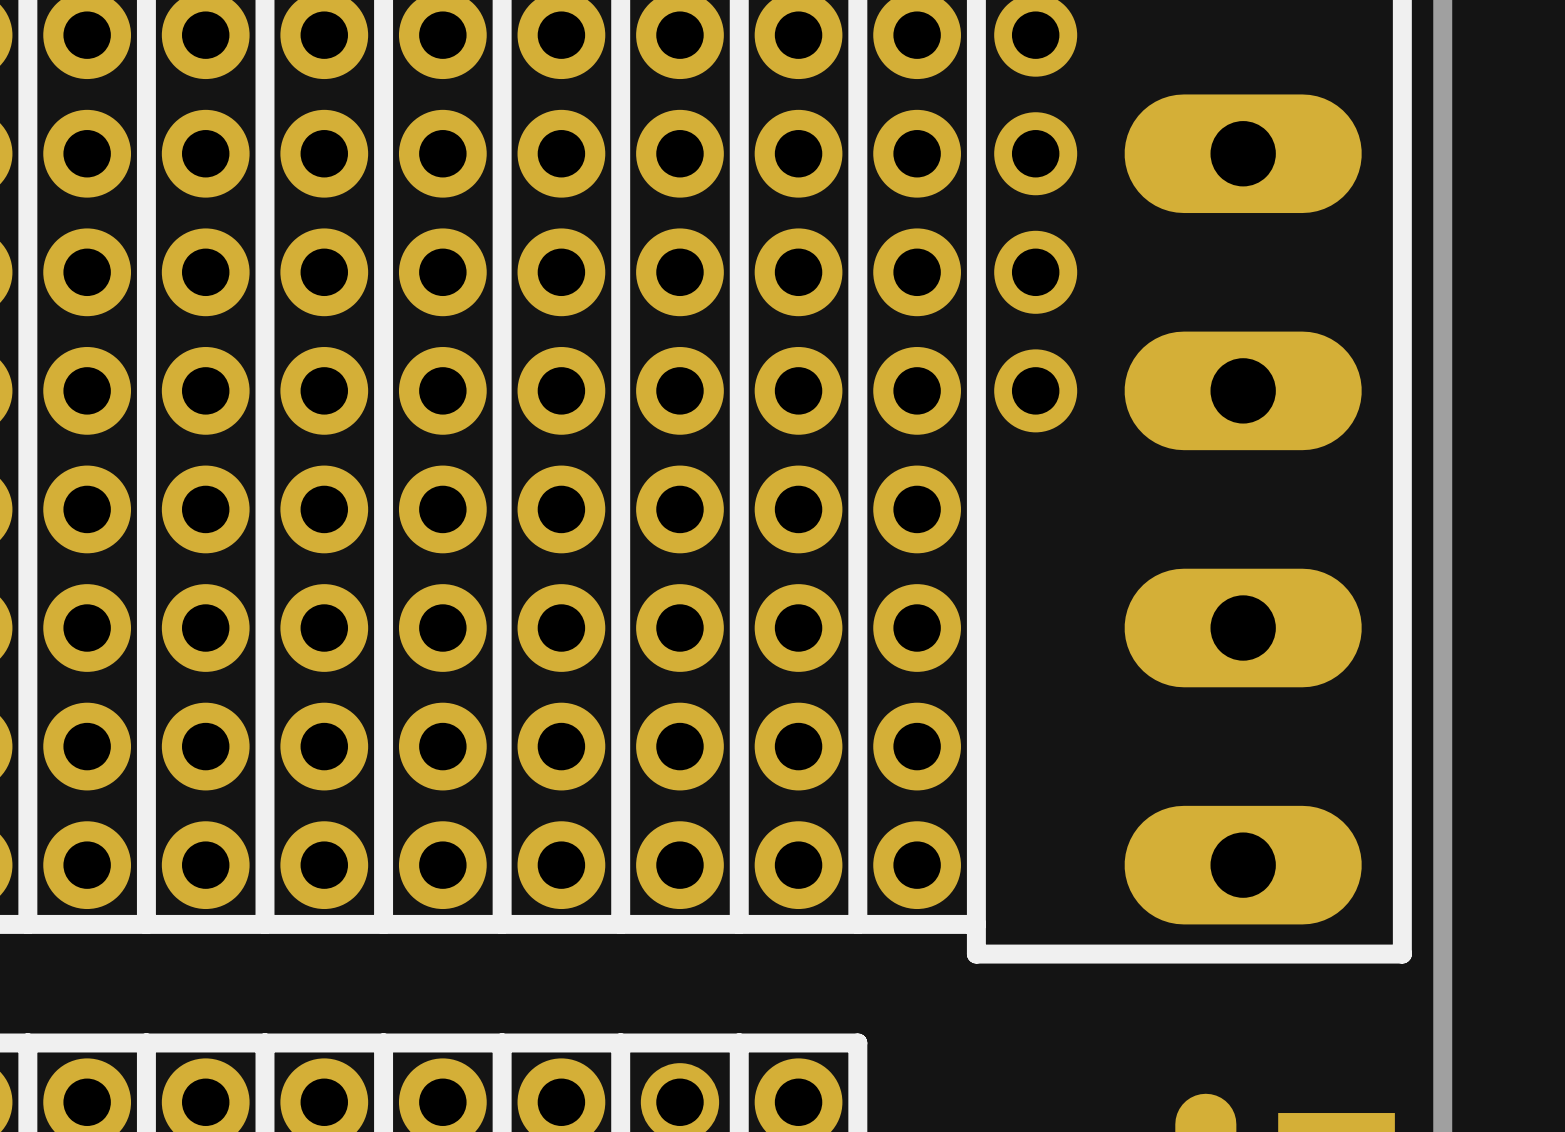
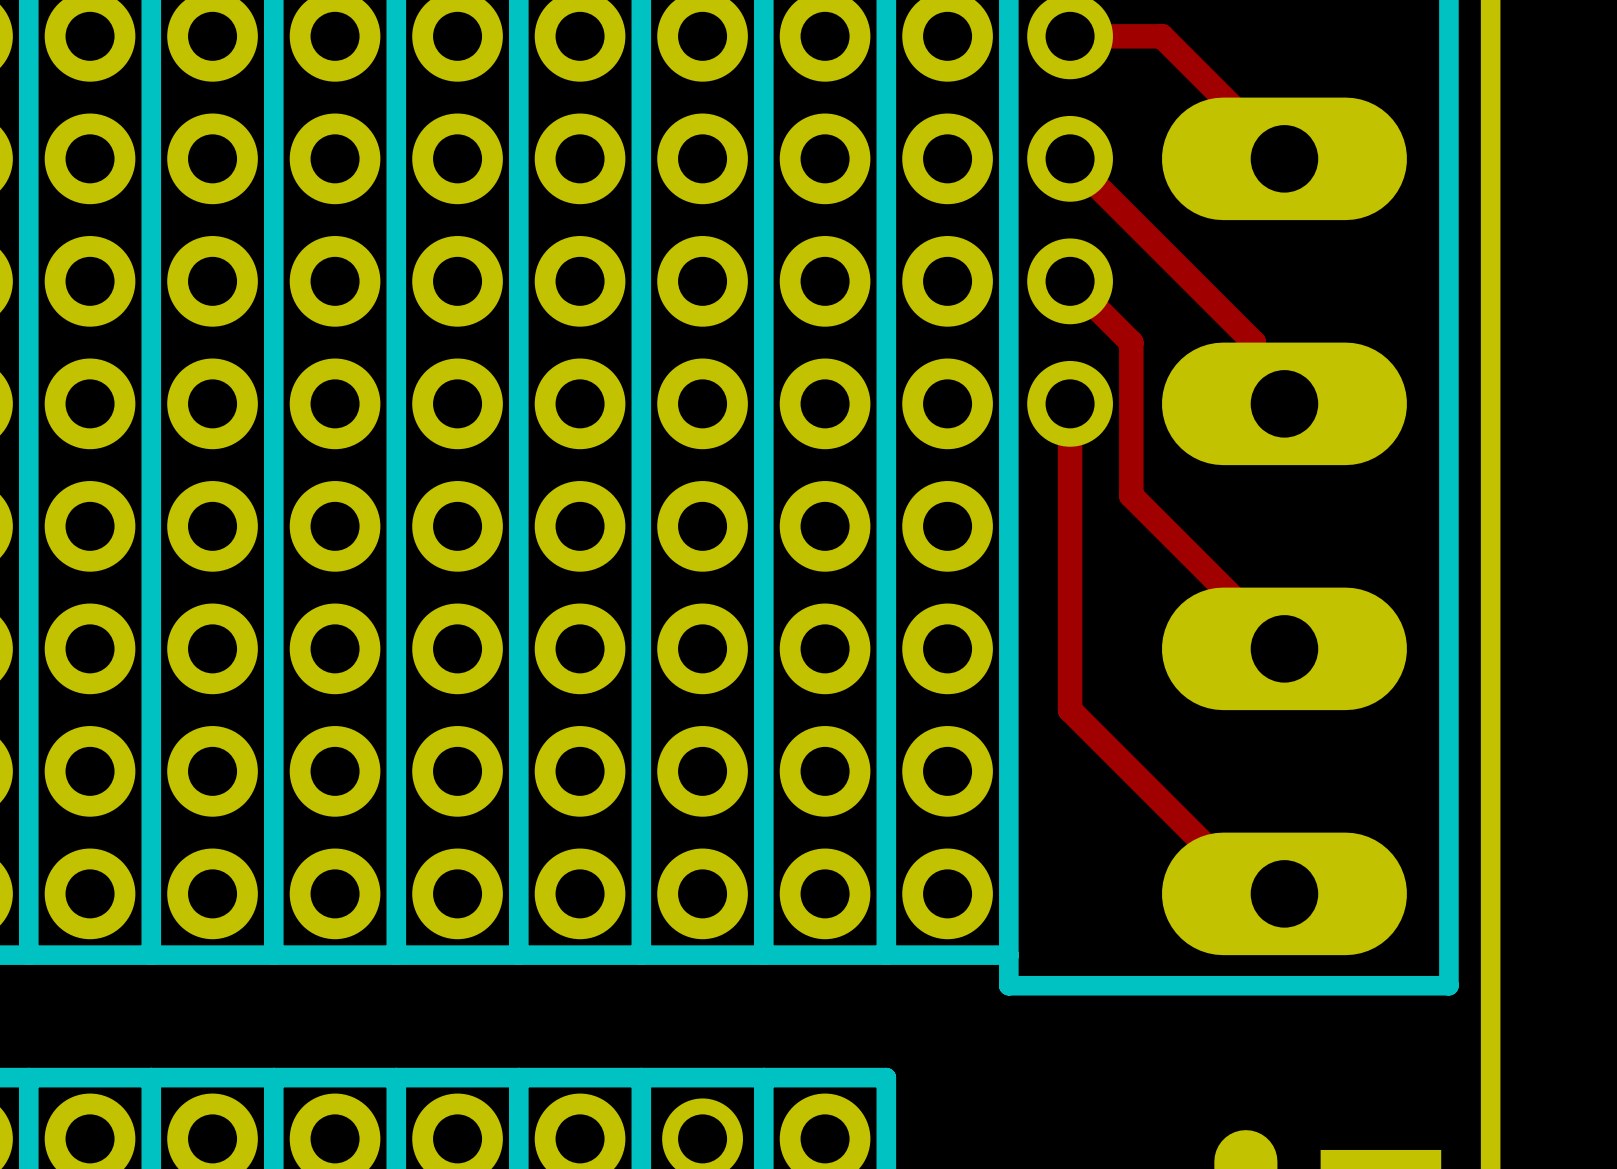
track: none -> (1070, 36) (1161, 36) (1284, 158)
track: none -> (1070, 158) (1253, 342) (1253, 373) (1284, 403)
track: none -> (1070, 281) (1131, 342) (1131, 495) (1284, 648)
track: none -> (1070, 403) (1070, 710) (1253, 893) (1284, 893)

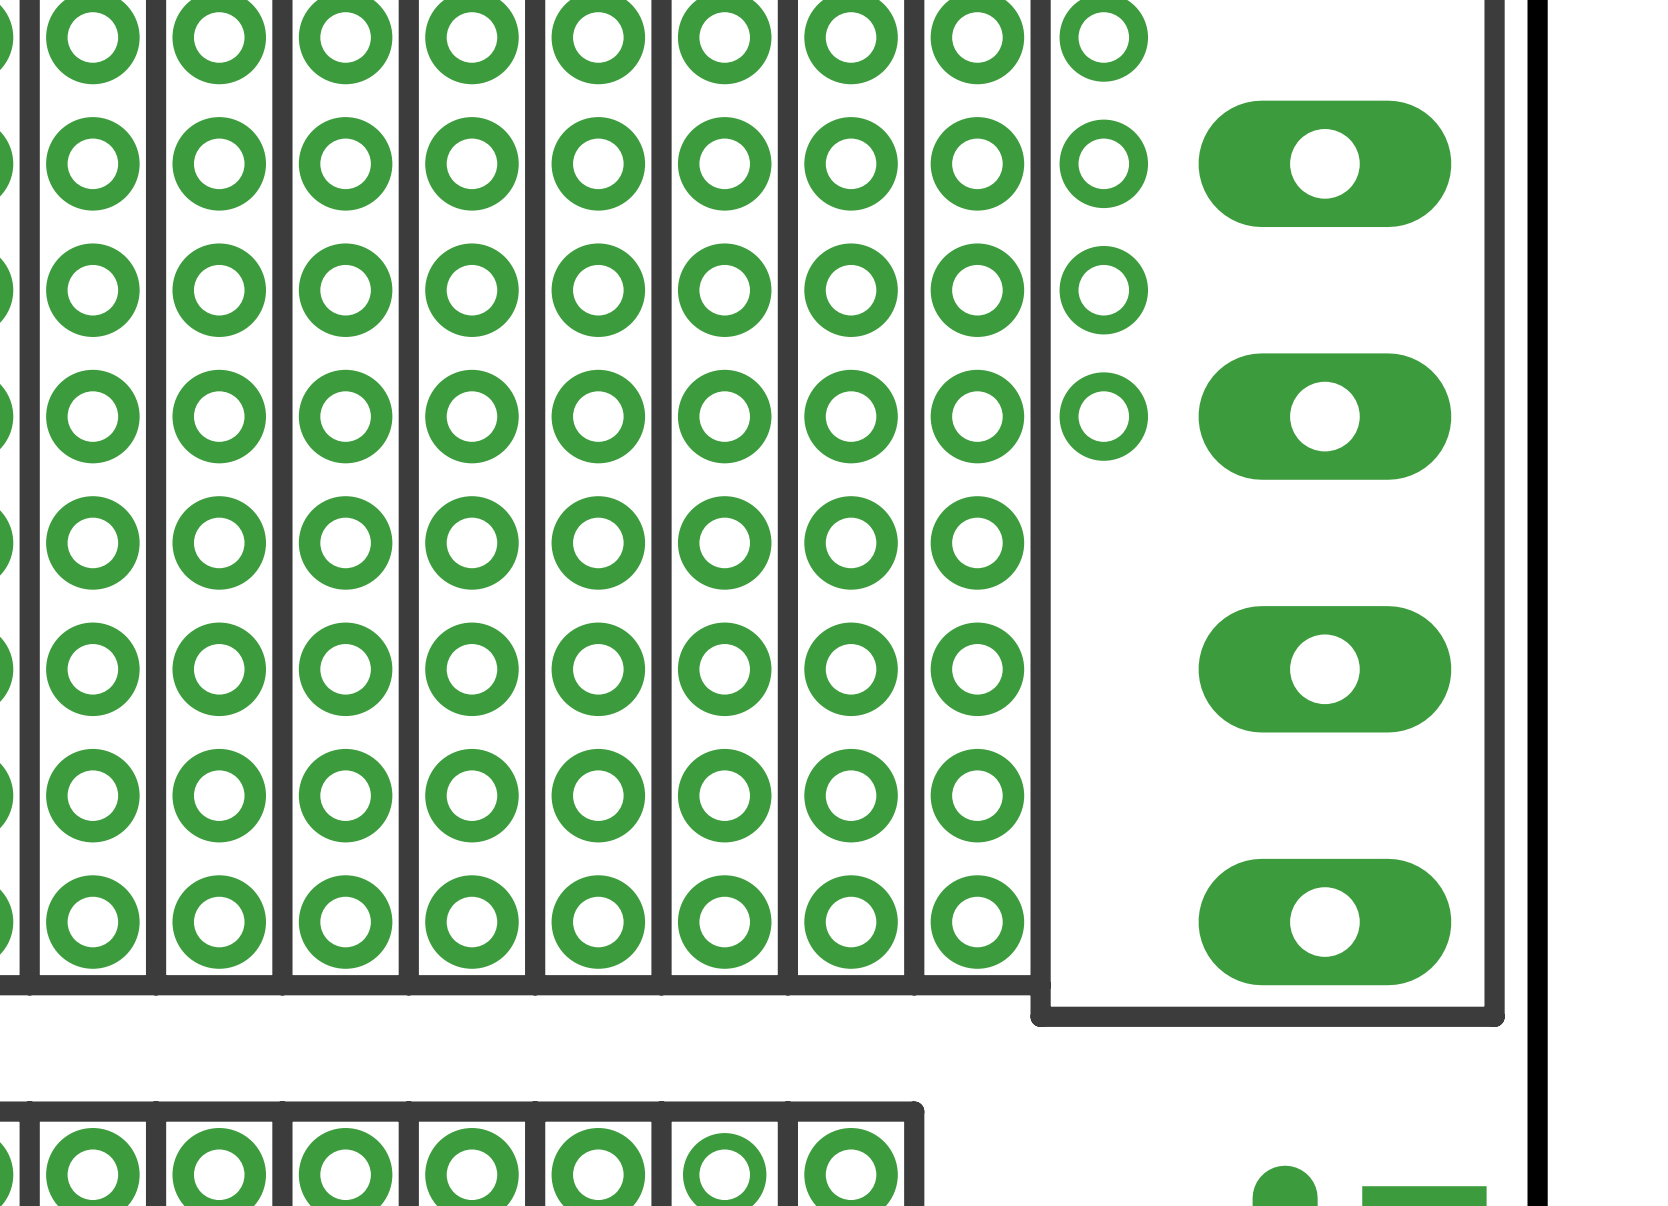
track: (1070, 36) (1161, 36) (1284, 158) -> none
track: (1070, 158) (1253, 342) (1253, 373) (1284, 403) -> none
track: (1070, 281) (1131, 342) (1131, 495) (1284, 648) -> none
track: (1070, 403) (1070, 710) (1253, 893) (1284, 893) -> none

